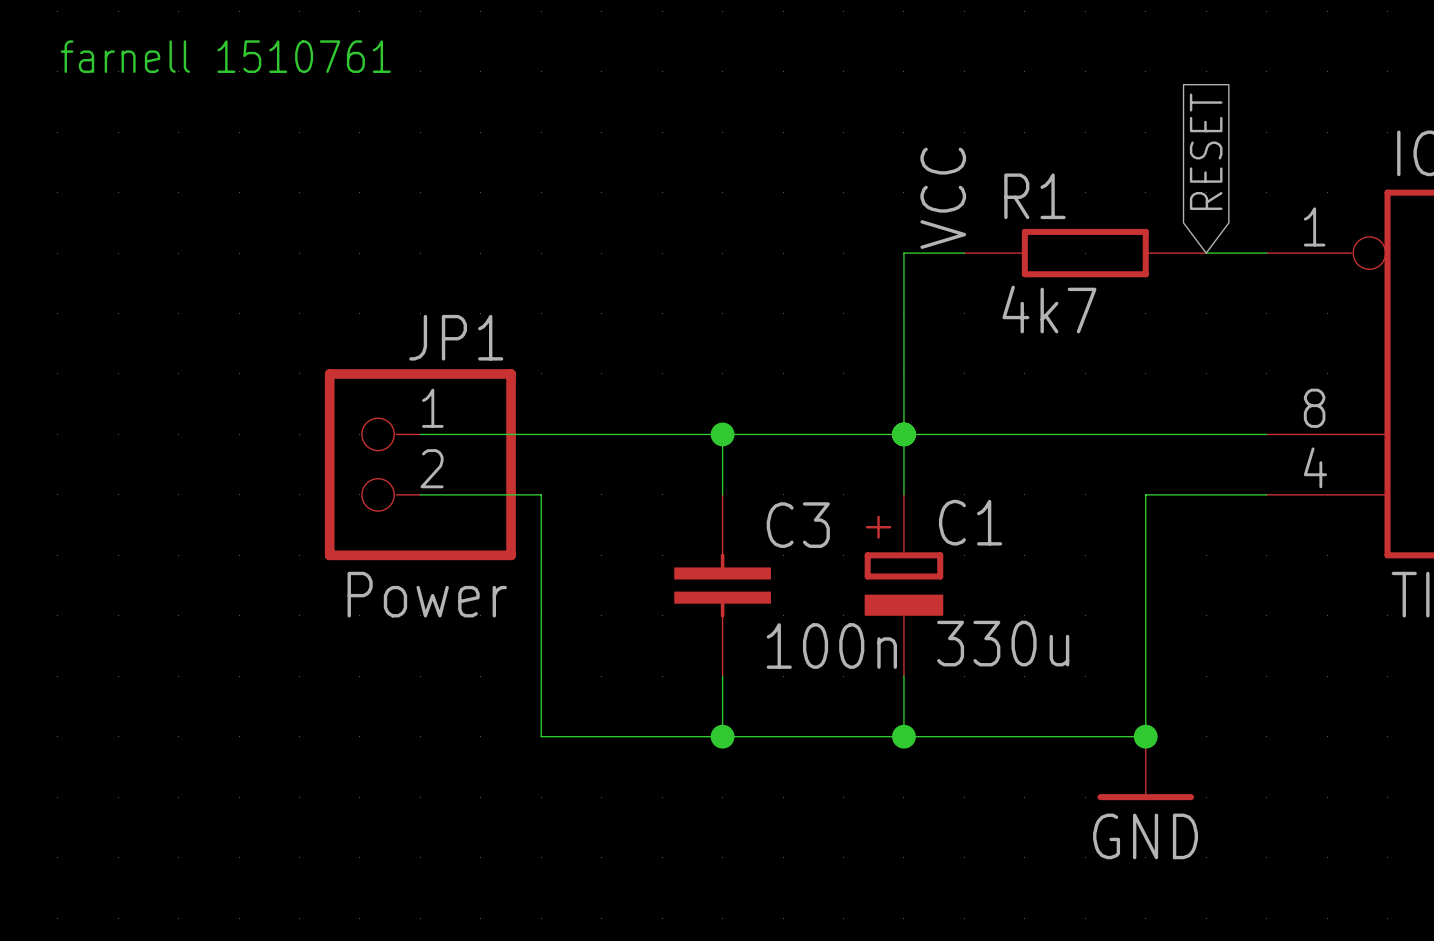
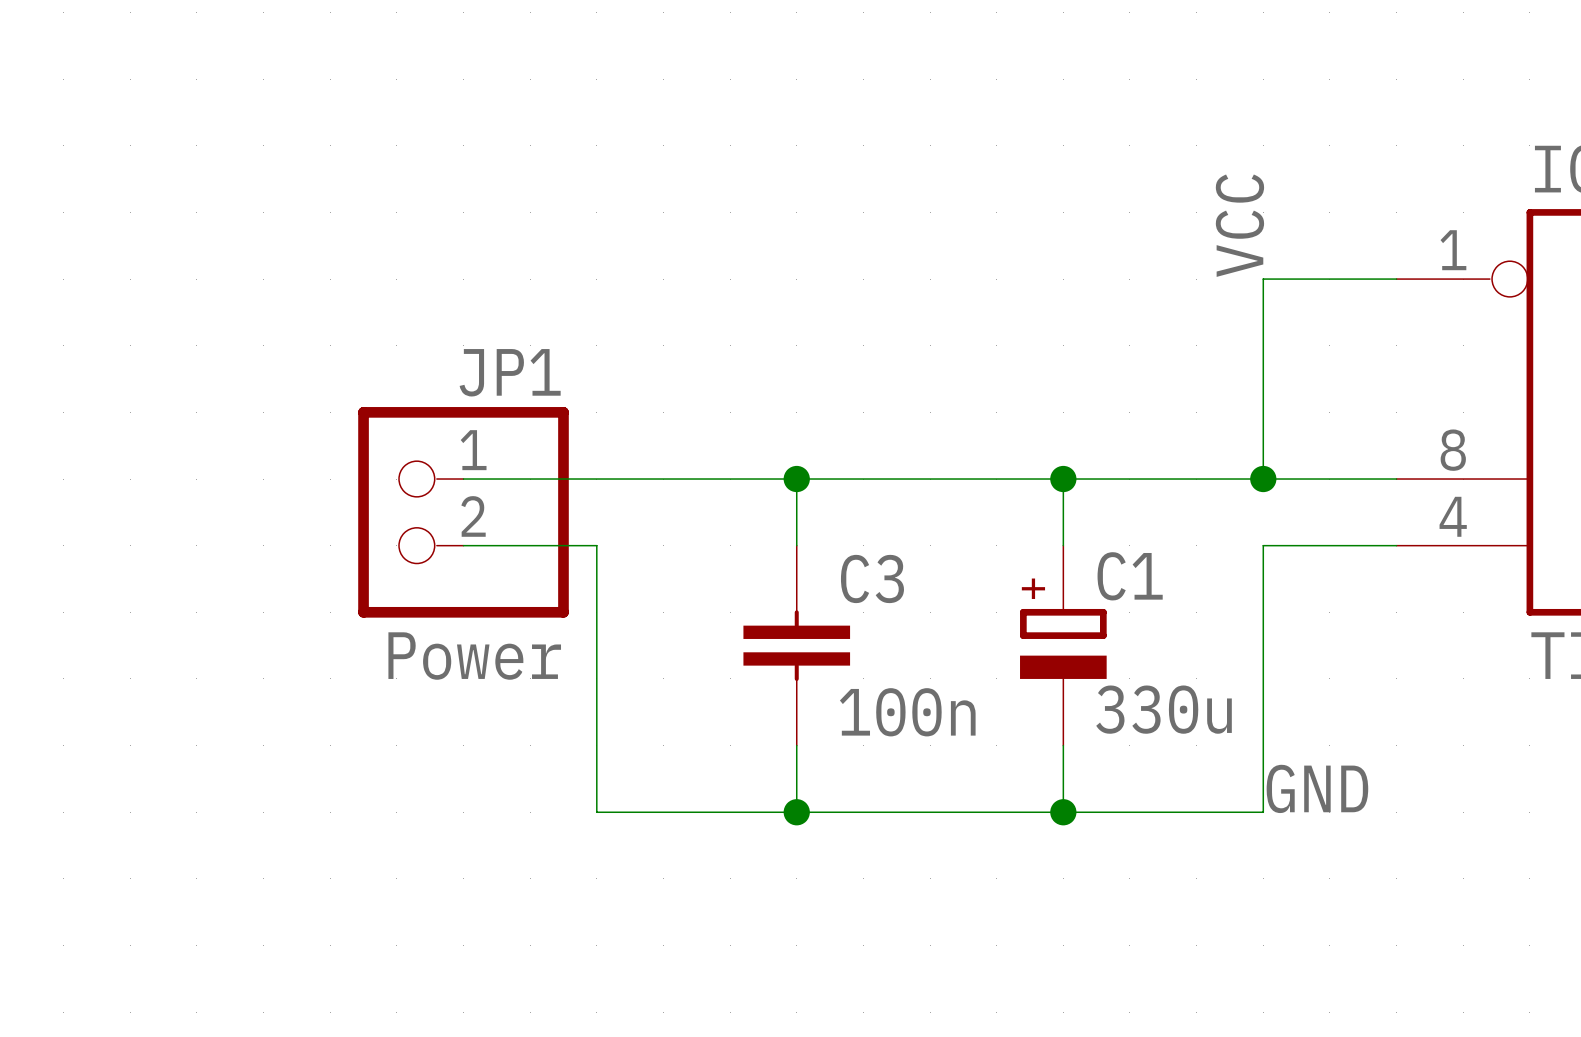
text: farnell 1510761 (225, 56) -> none
global label: RESET (1206, 151) -> none
label position: VCC (943, 198) -> VCC (1239, 225)
wire: (964, 253) (903, 253) (903, 494) -> none
R1: 4k7 (1085, 253) -> none
wire: none -> (1329, 279) (1263, 279) (1263, 479)
junction position: (903, 434) -> (1063, 479)
wire: none -> (1063, 479) (1063, 545)
junction: none -> (1263, 479)
C1 position: (903, 585) -> (1063, 645)
wire: (903, 676) (903, 736) -> (1063, 745) (1063, 812)
label: none -> GND (1317, 788)
junction position: (903, 736) -> (1063, 812)
junction: (1145, 736) -> none
power symbol: GND (1145, 768) -> none

